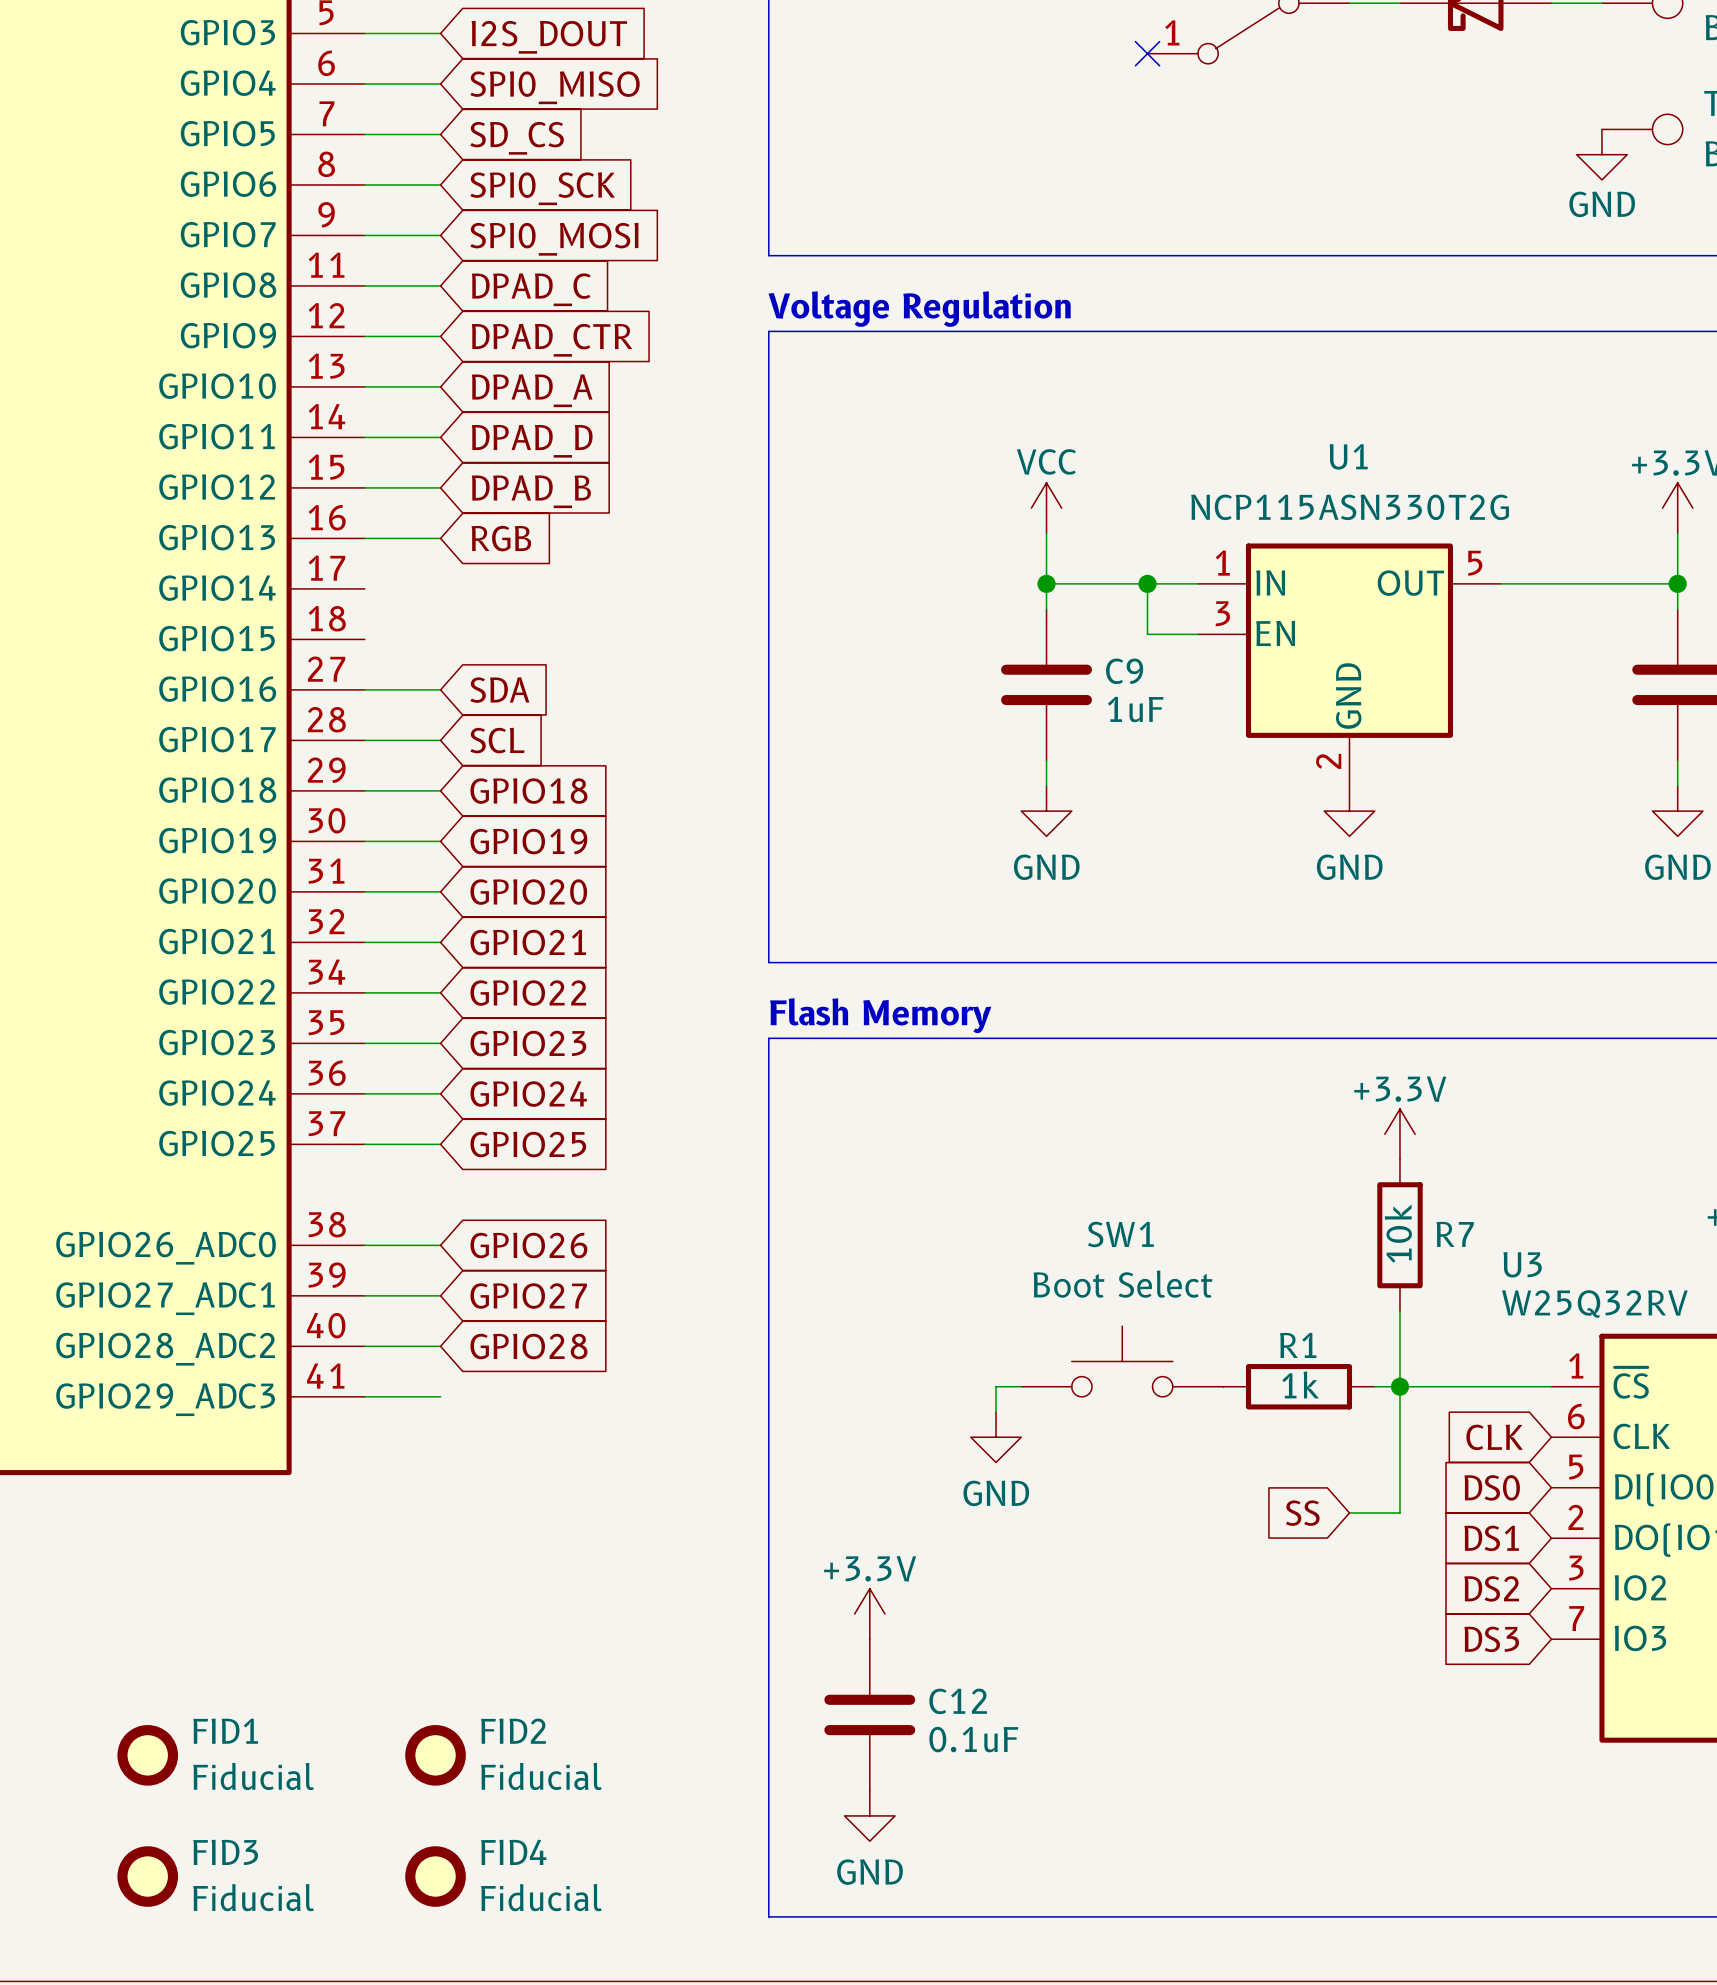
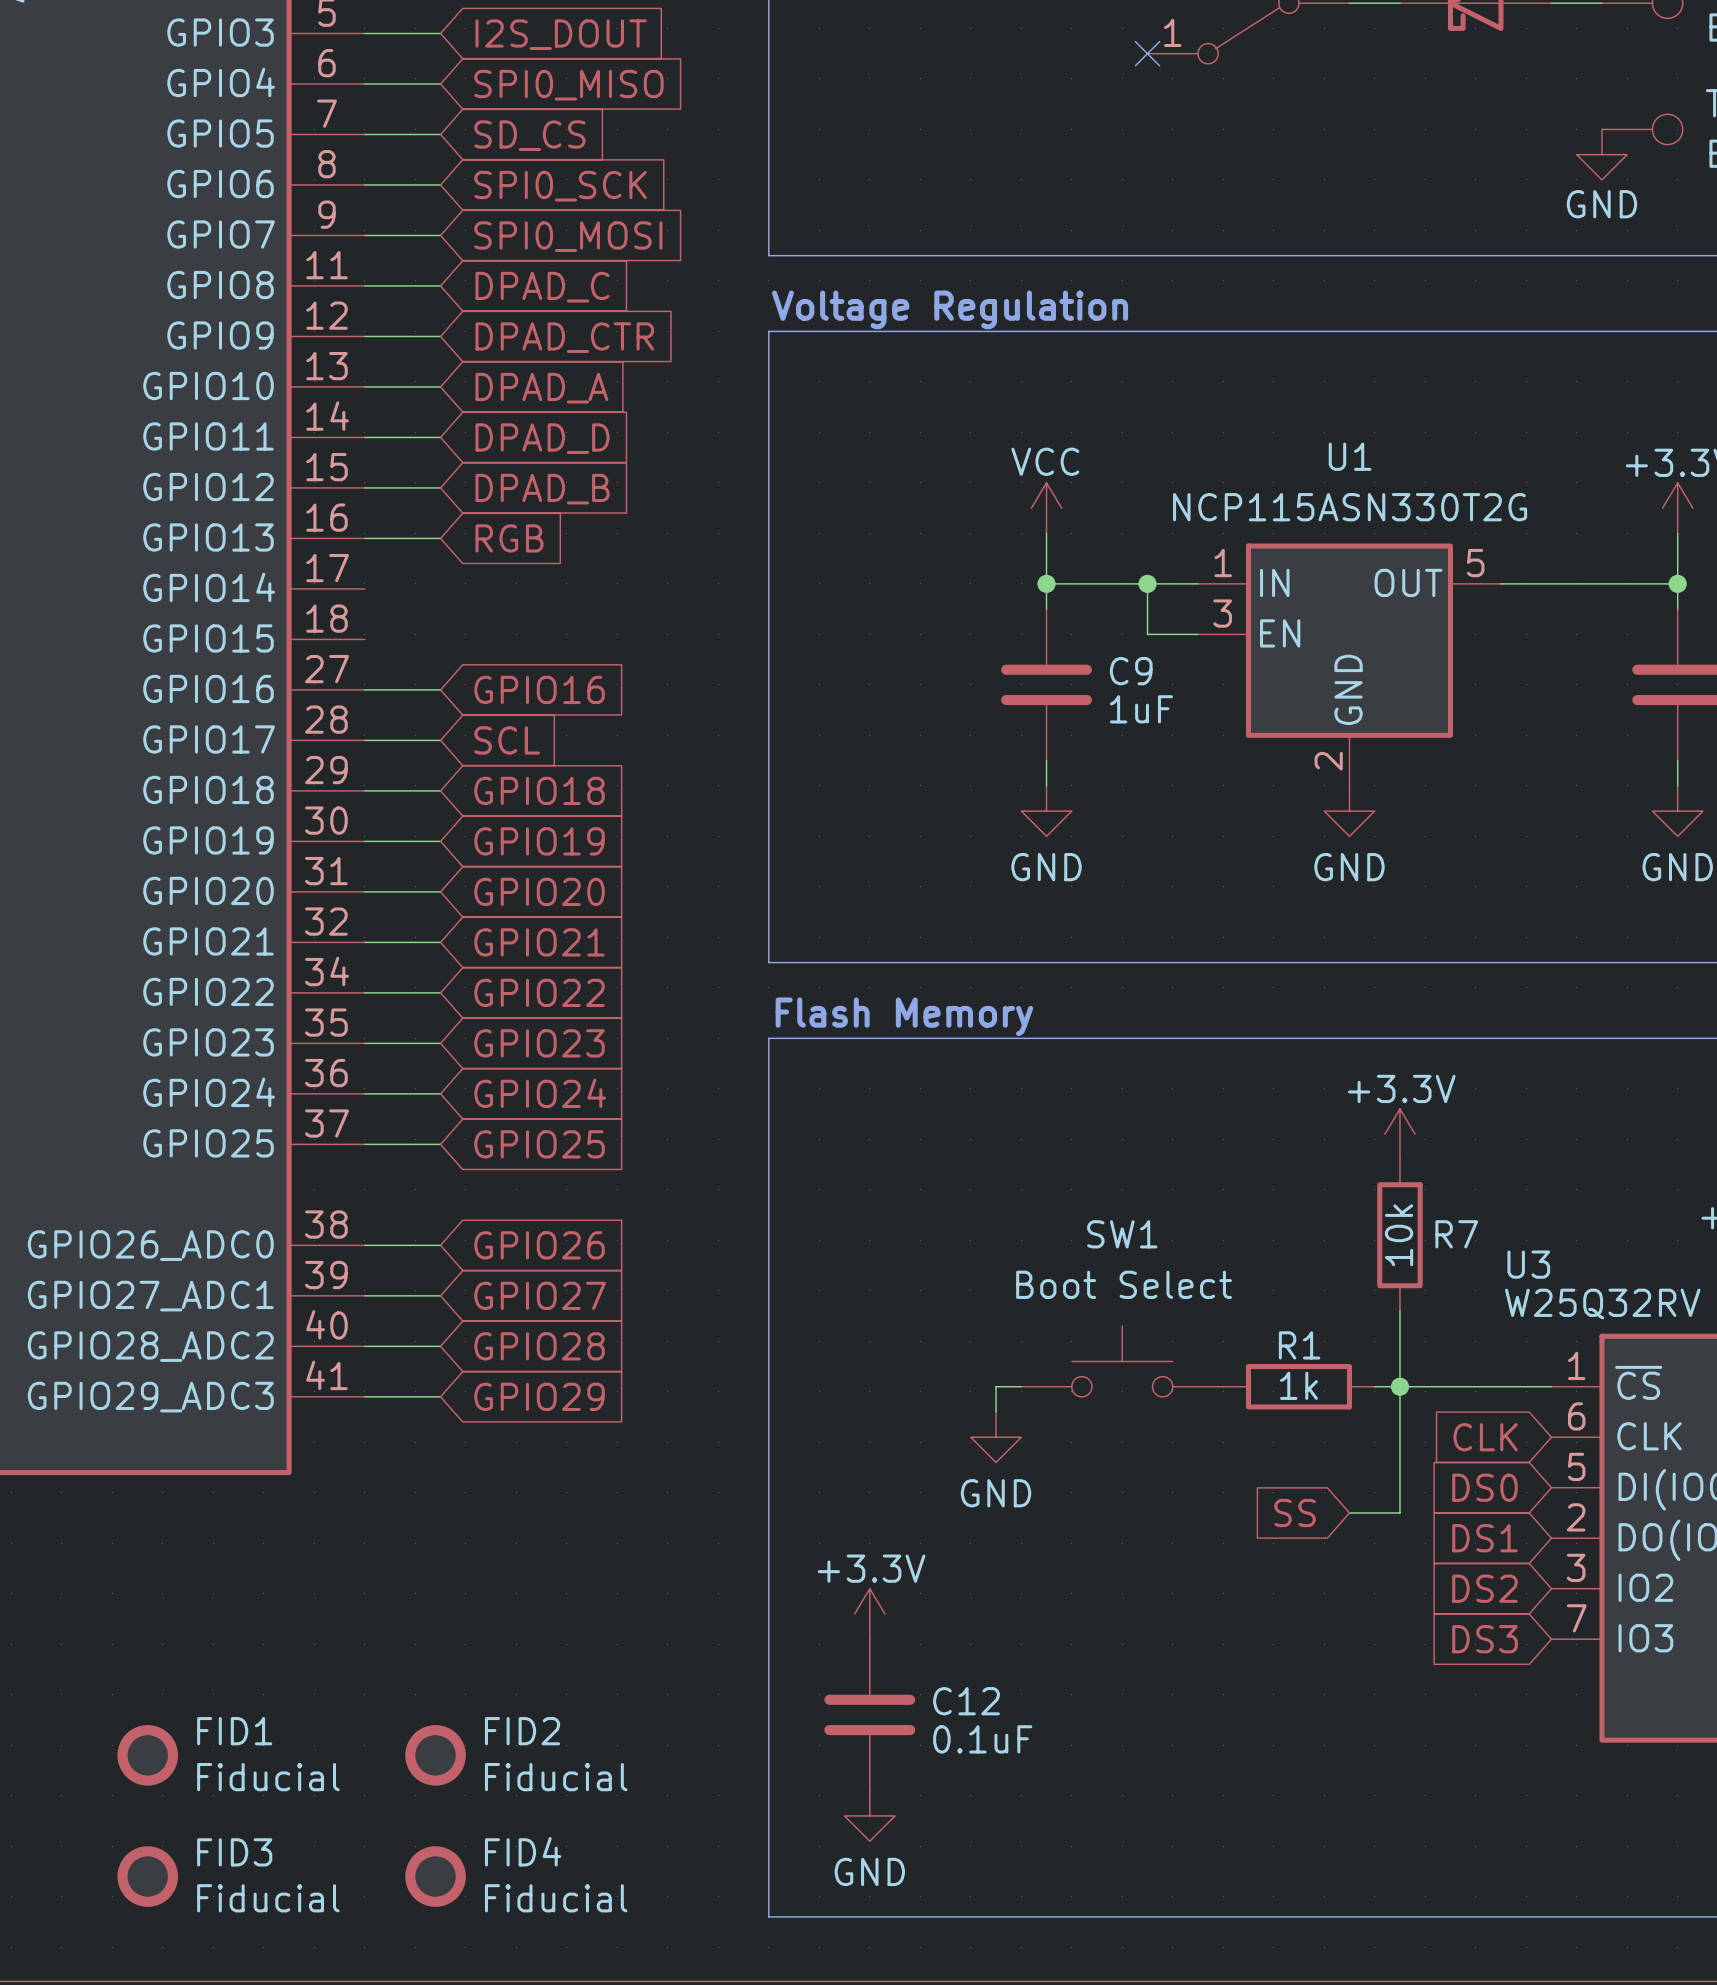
global label: SDA (499, 690) -> GPIO16 (539, 689)
global label: none -> GPIO29 (539, 1396)

